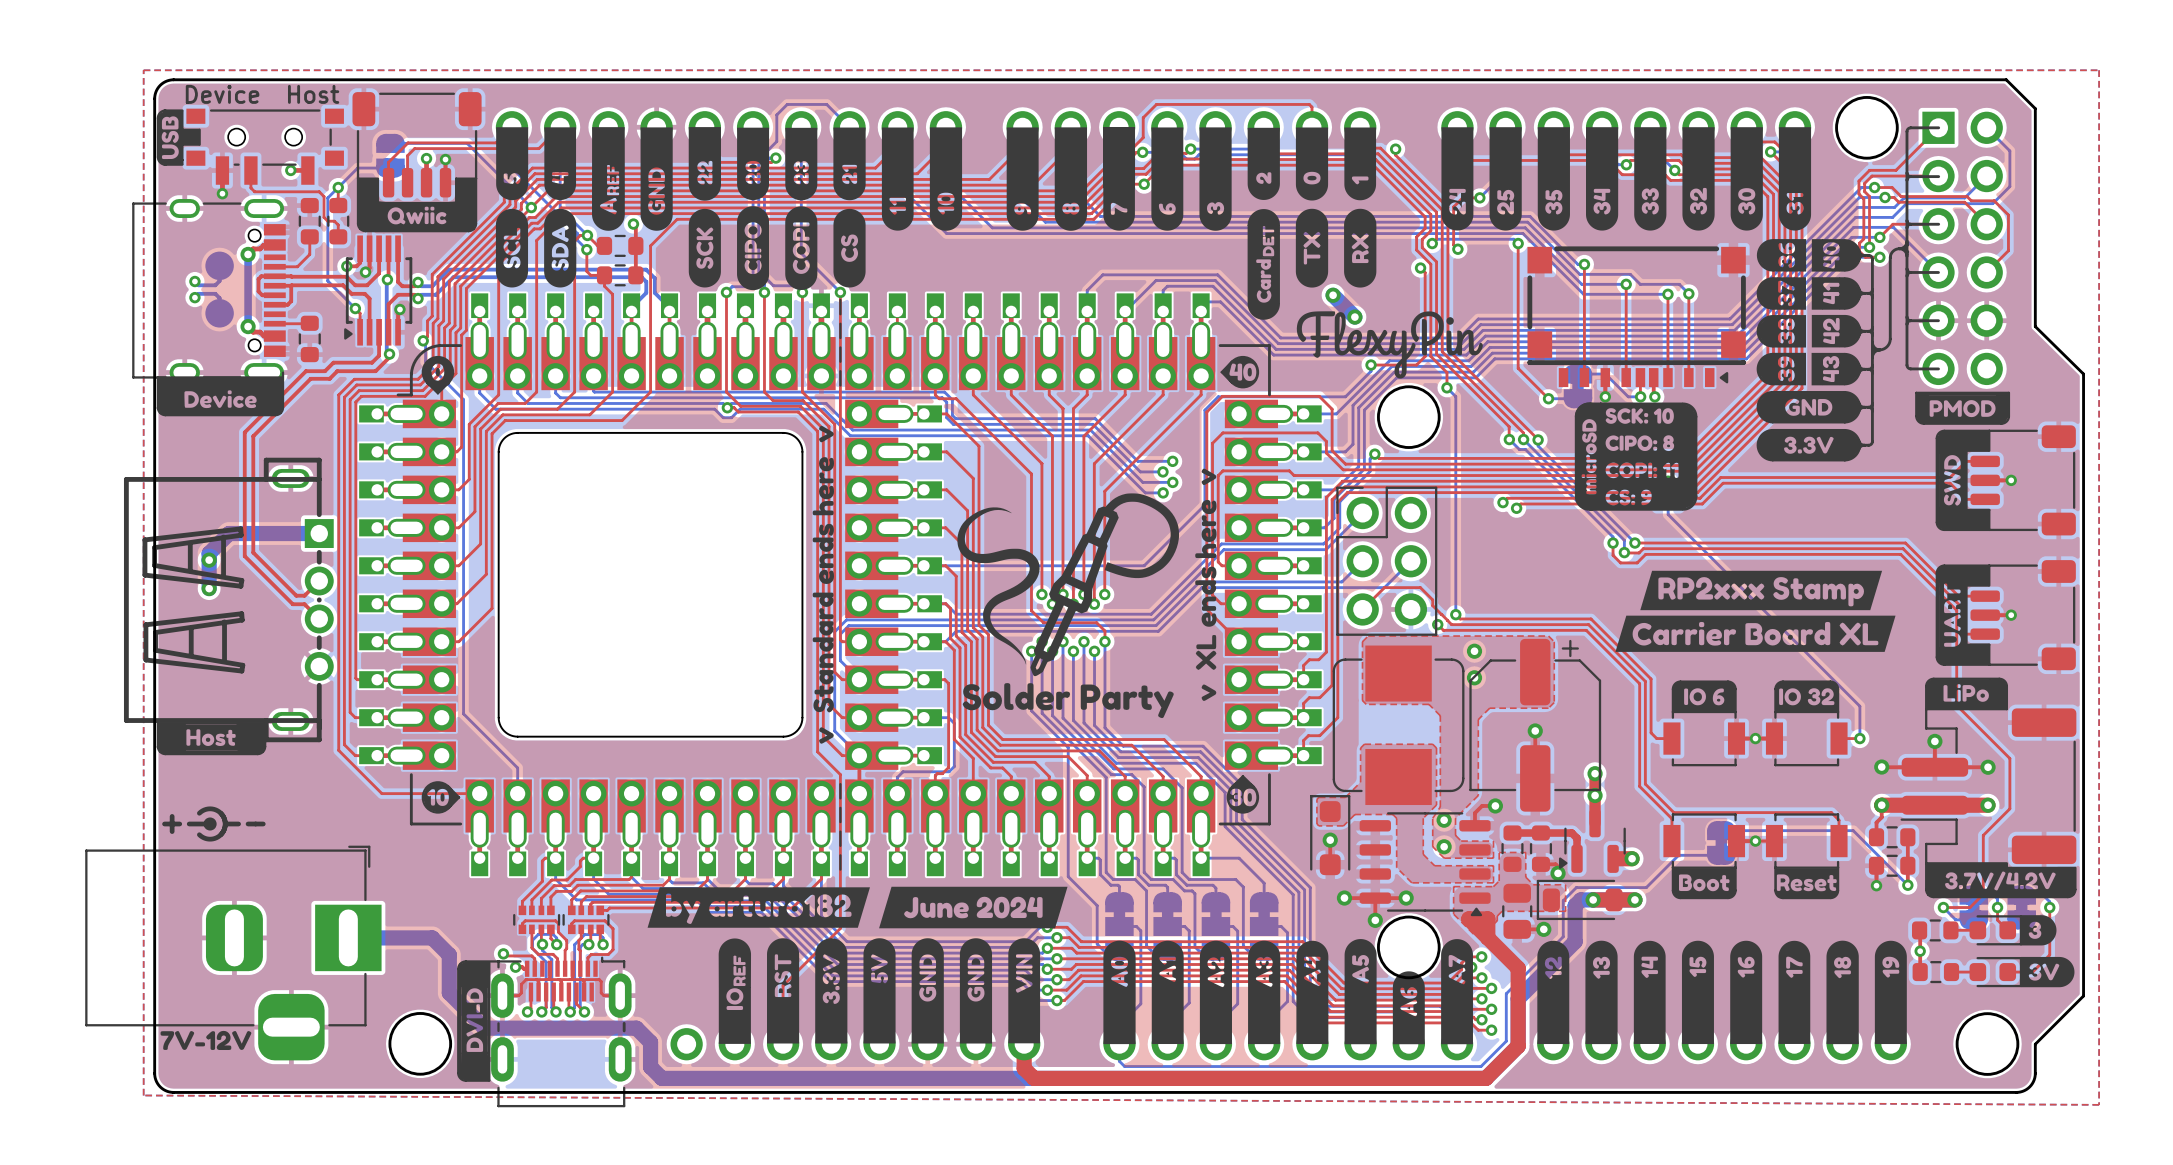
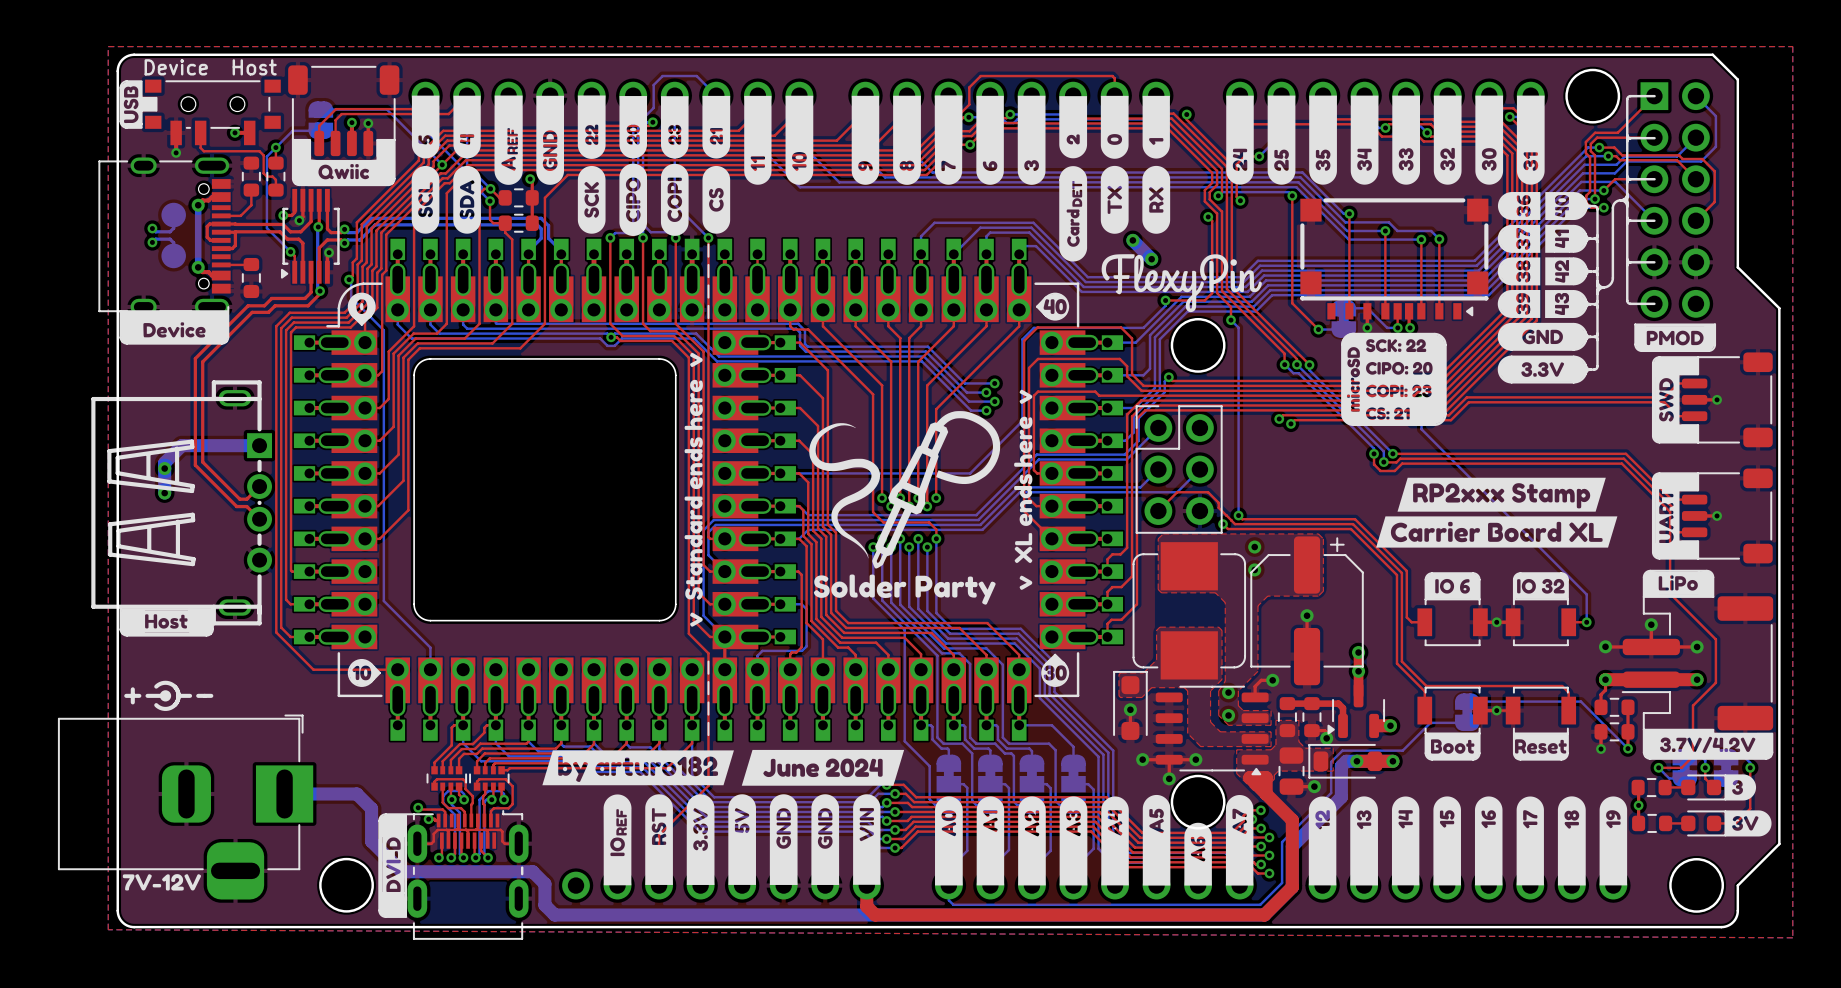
drawing shape: [1600, 402, 1684, 511] -> [1364, 332, 1435, 426]

